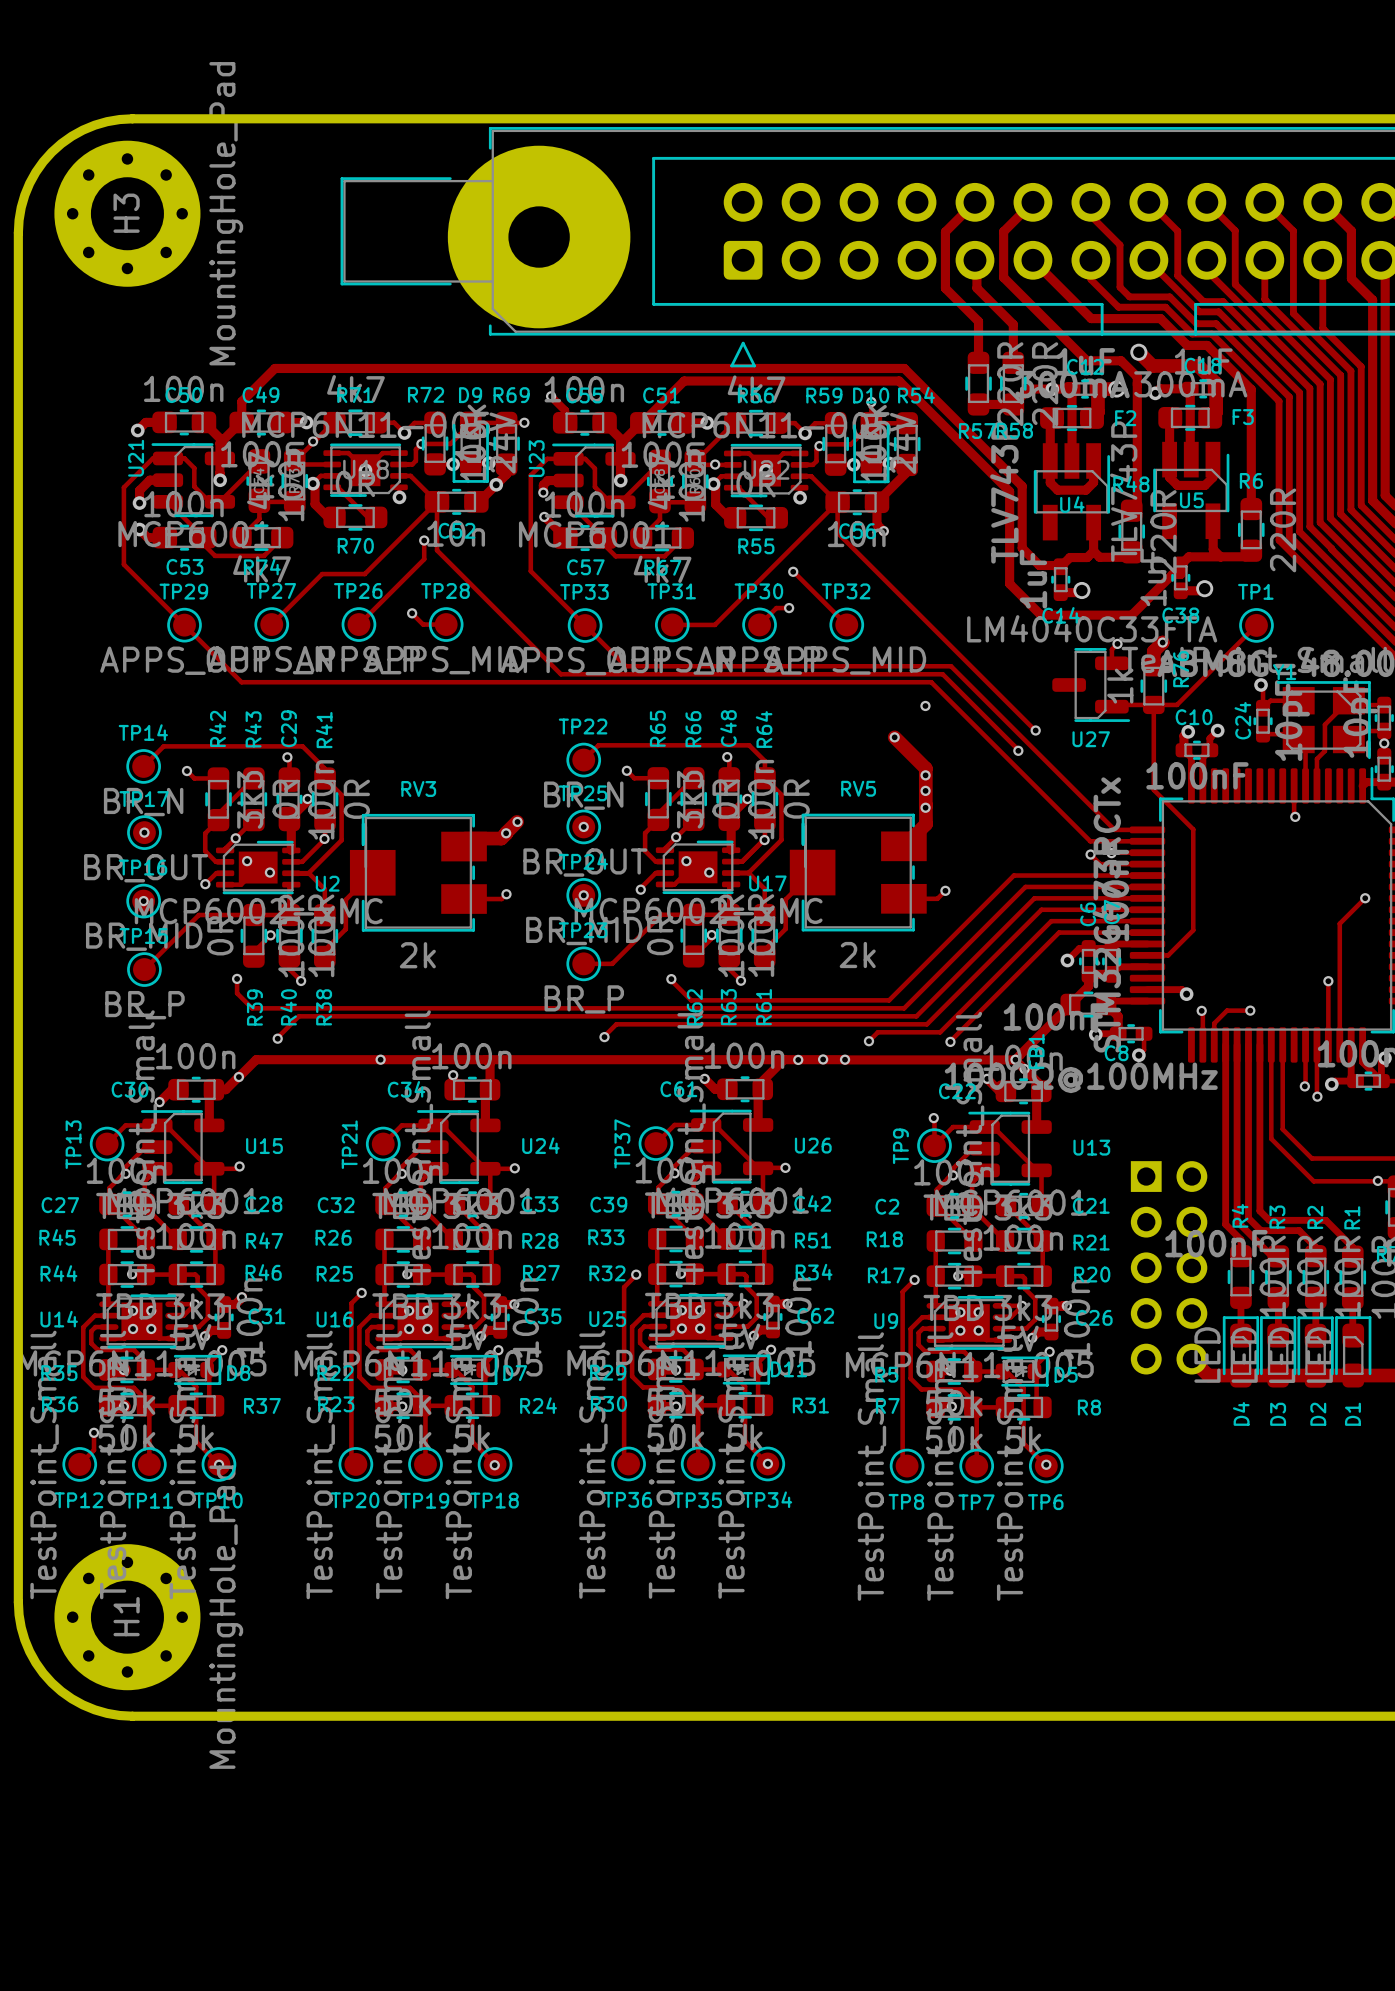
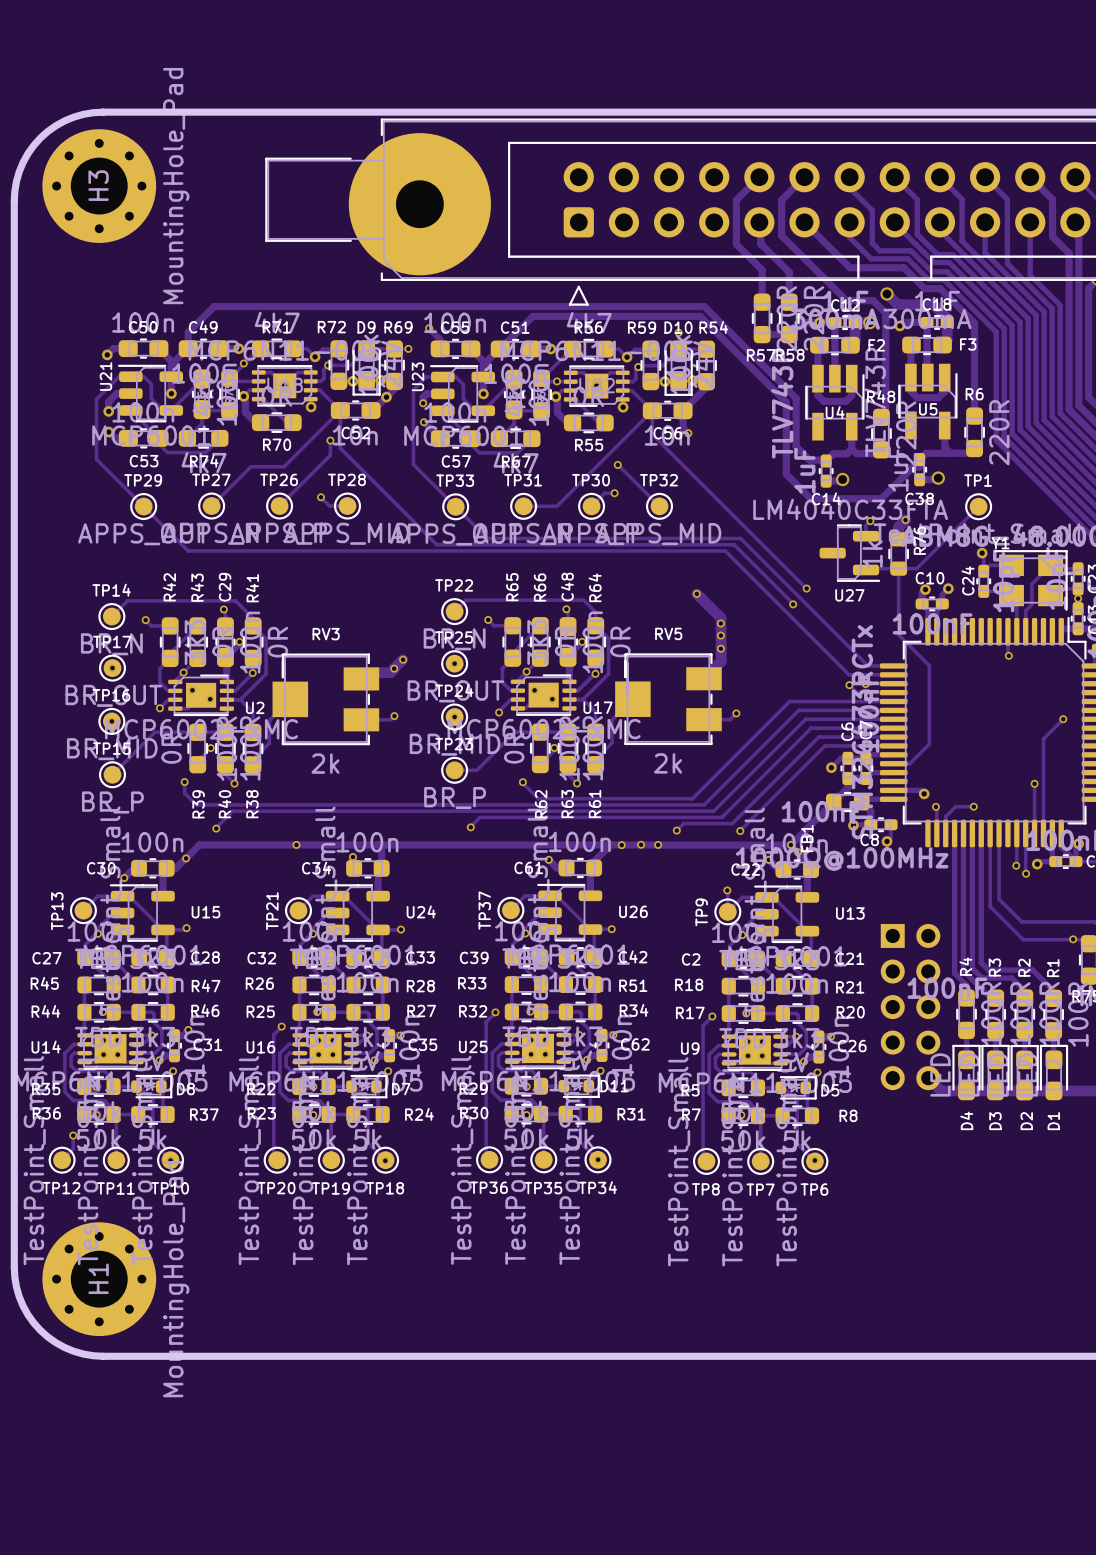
via: (925, 705) -> none

